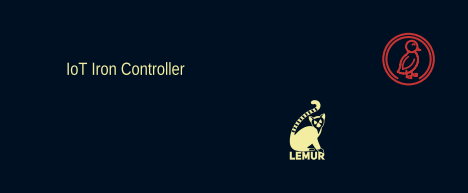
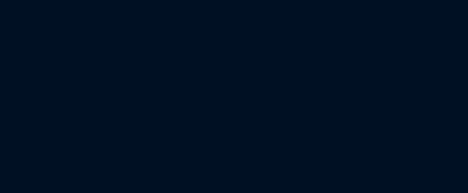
drawing: [382, 32, 435, 86] -> none
text: IoT Iron Controller (125, 68) -> none
drawing: [289, 100, 326, 160] -> none

